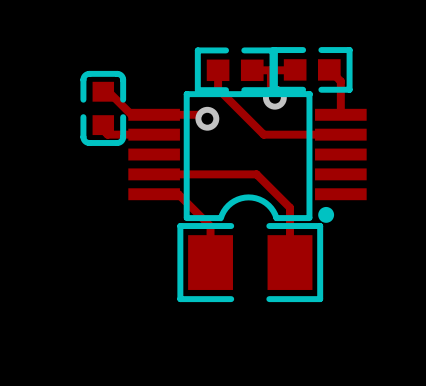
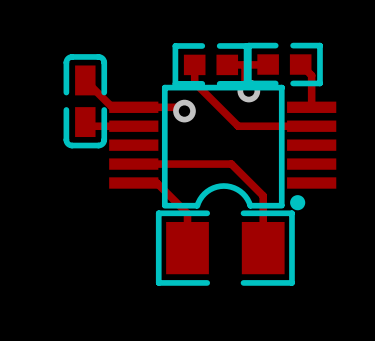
part footprint: [80, 70, 127, 146] -> [63, 54, 108, 149]

